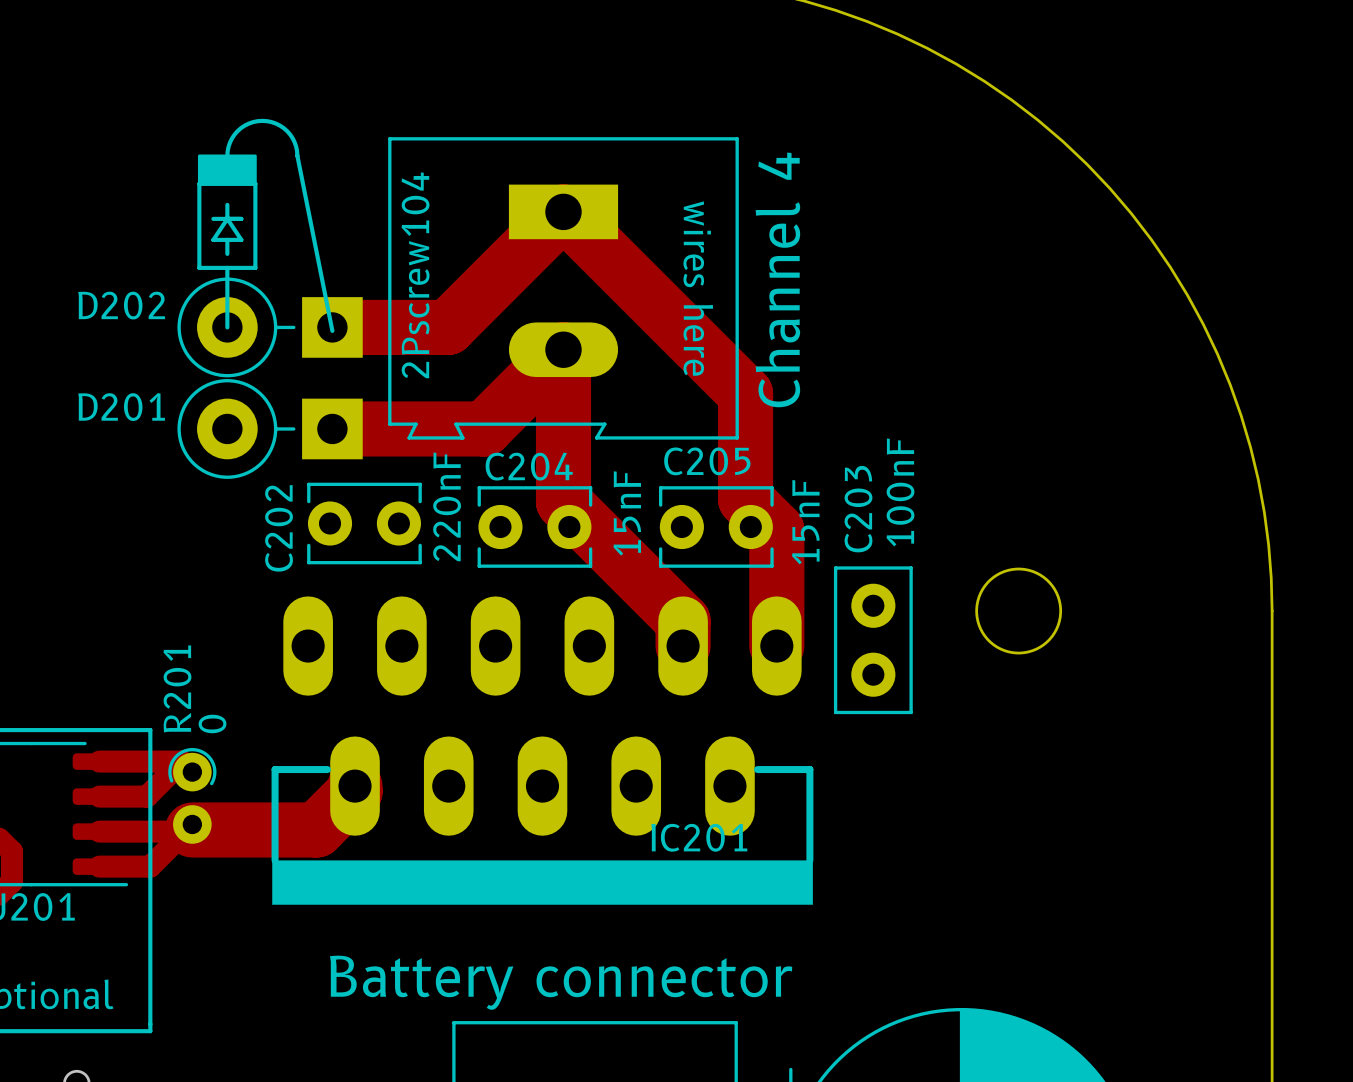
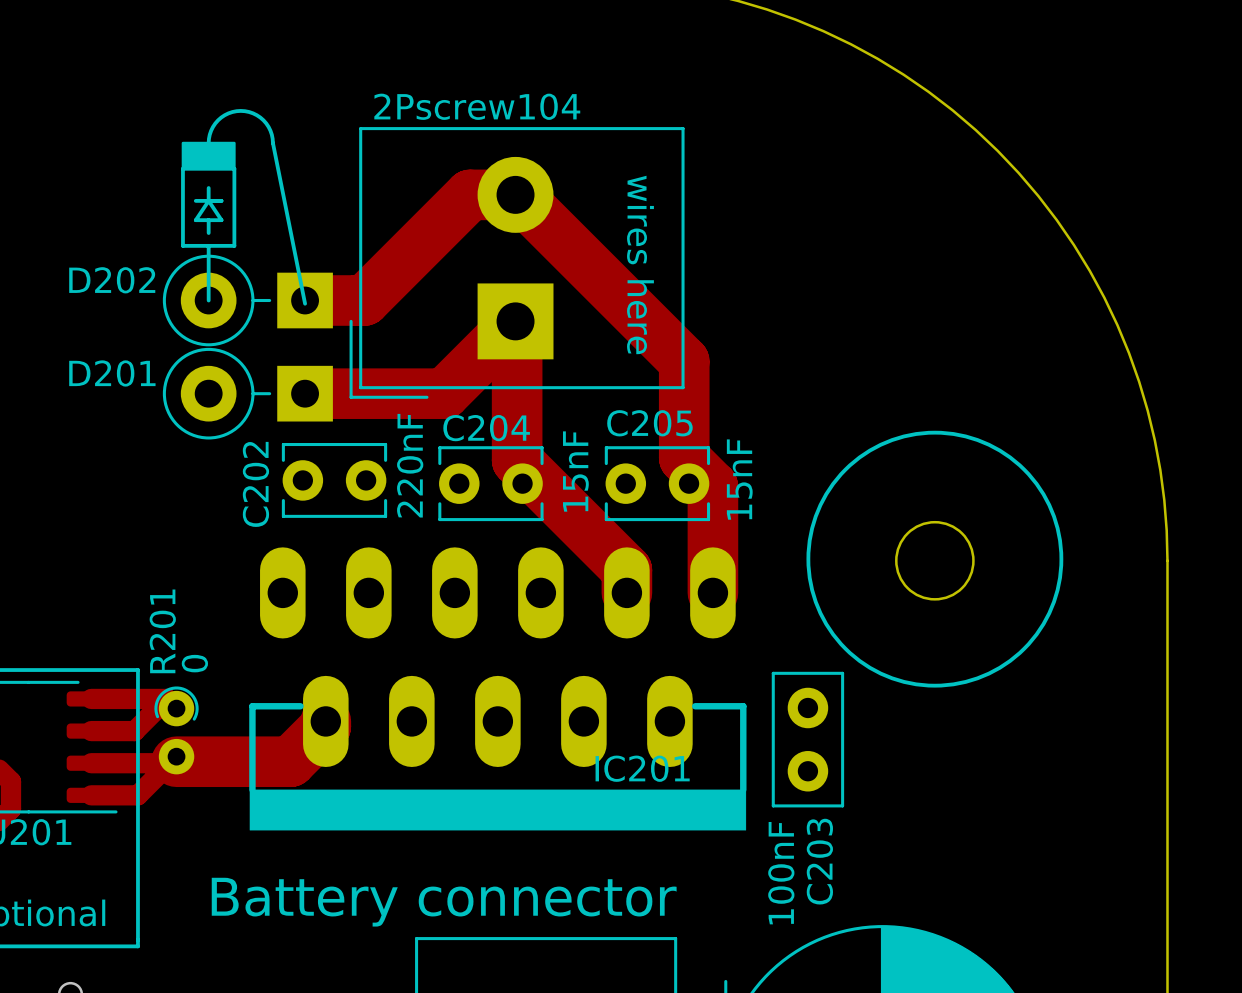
2Pscrew104 footprint: [388, 137, 739, 440] -> [349, 127, 685, 399]
track: (563, 211) (447, 327) (397, 327) -> (515, 194) (470, 194) (364, 300)
2Pscrew104 name position: 2Pscrew104 (415, 275) -> 2Pscrew104 (477, 106)
2Pscrew104 value: Channel 4 (777, 279) -> none
drawing: none -> [806, 430, 1064, 688]
C203 value position: 100nF (900, 492) -> 100nF (781, 873)
C203 name position: C203 (858, 509) -> C203 (819, 861)
C203 position: (873, 640) -> (807, 739)
part value position: Battery connector (561, 982) -> Battery connector (444, 902)

